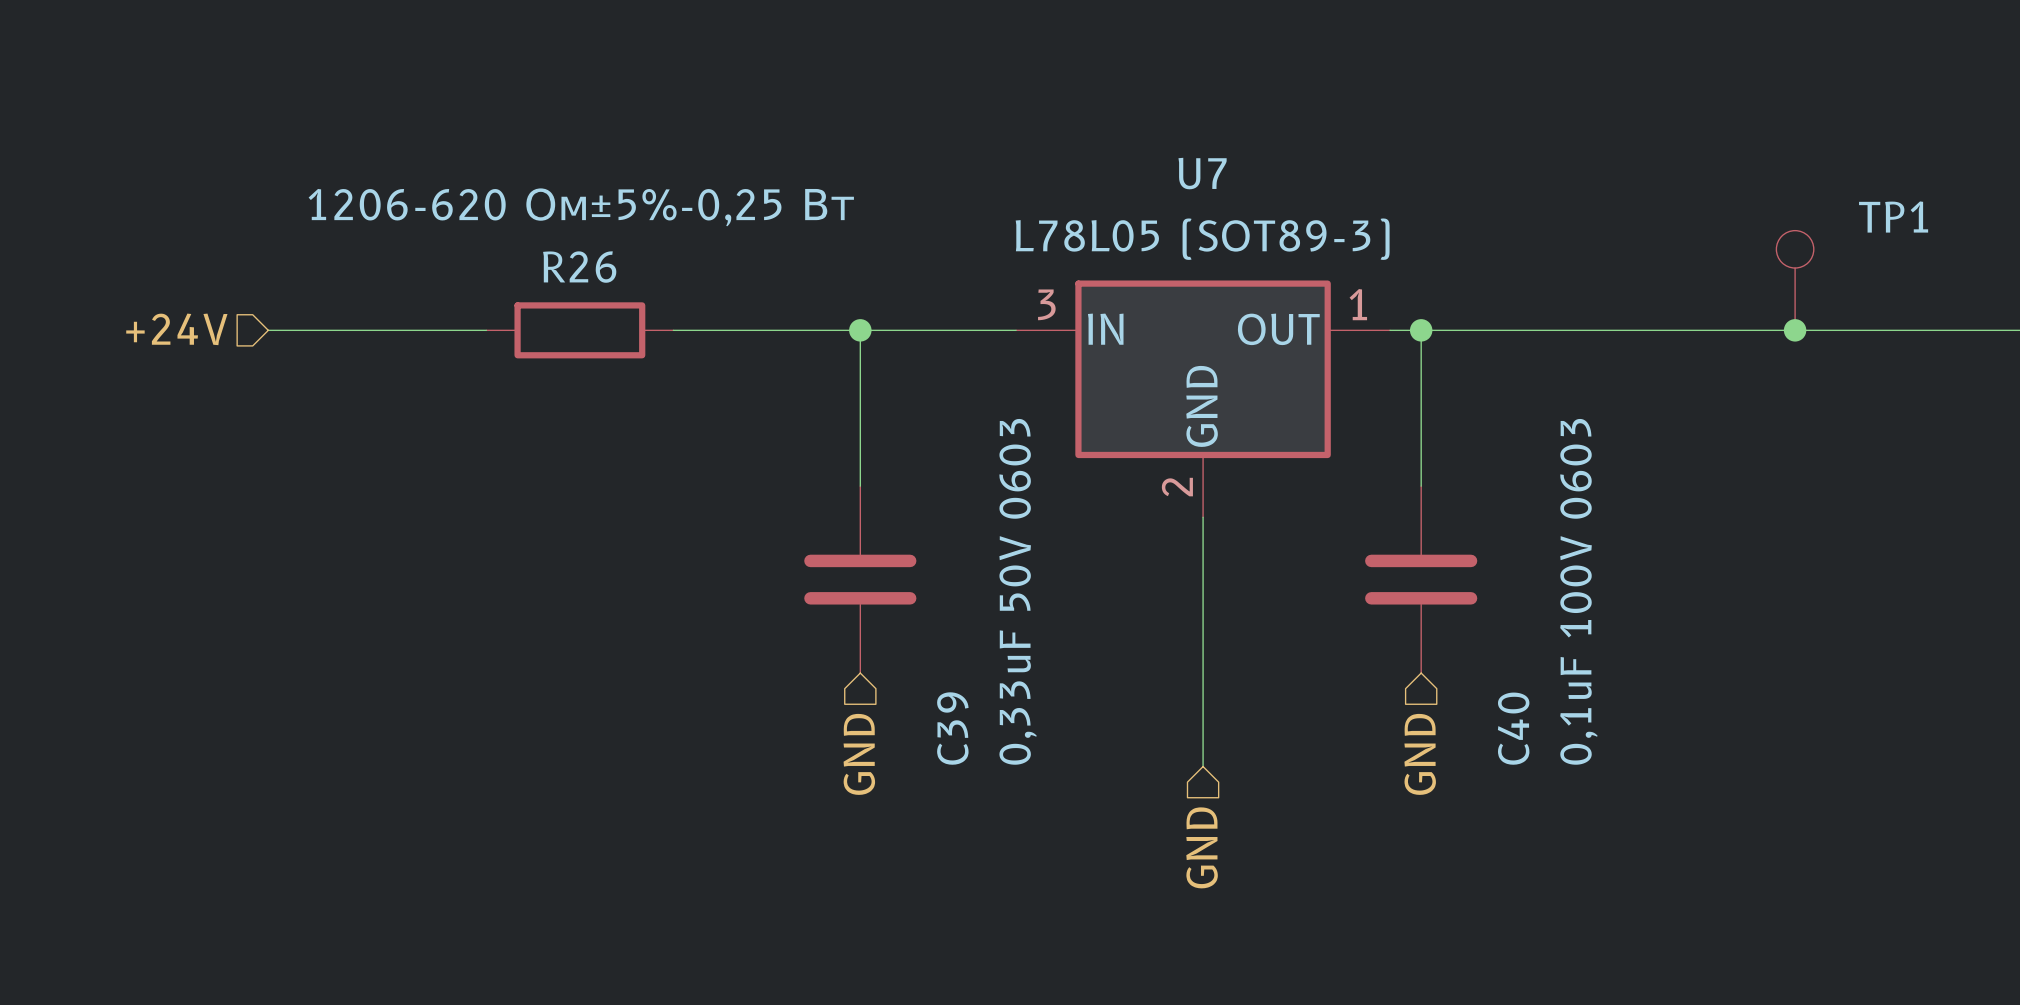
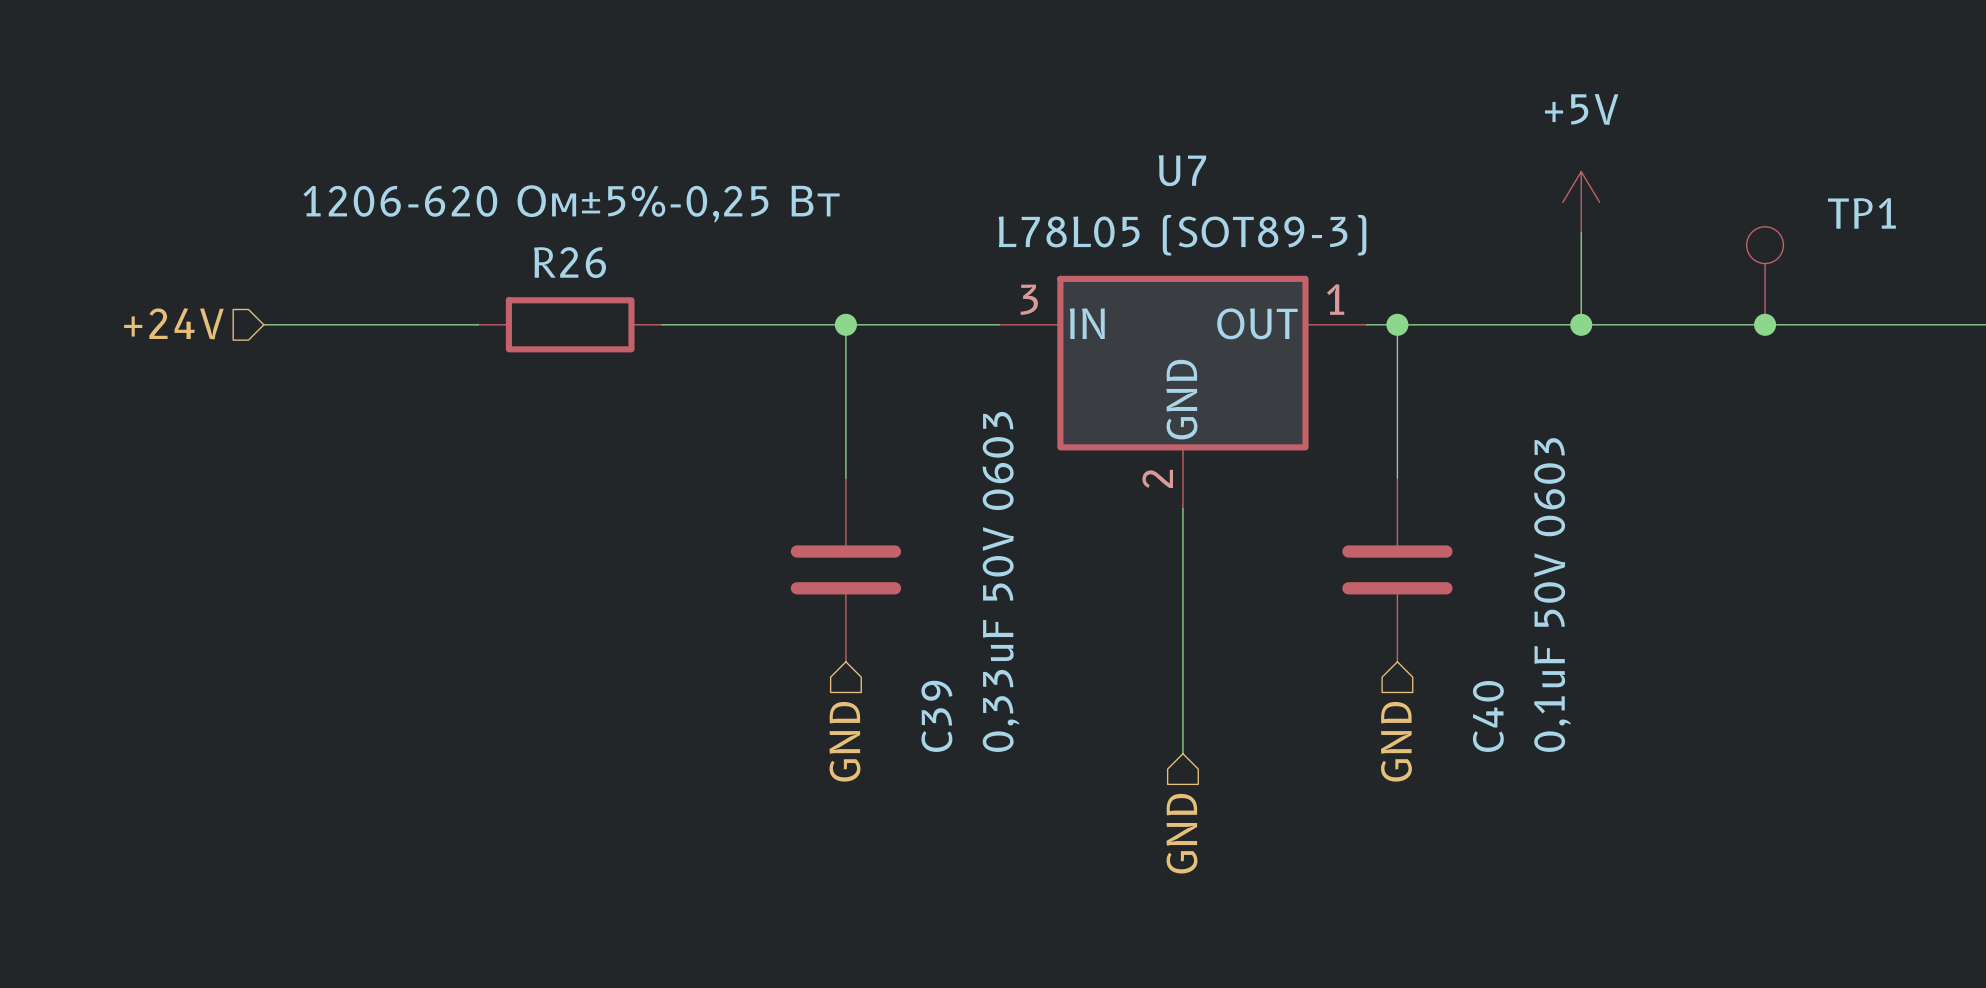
power symbol: none -> +5V (1581, 202)
wire: none -> (1581, 232) (1581, 324)
junction: none -> (1581, 324)
C40 value: 0,1uF 100V 0603 (1578, 591) -> 0,1uF 50V 0603 (1552, 595)

